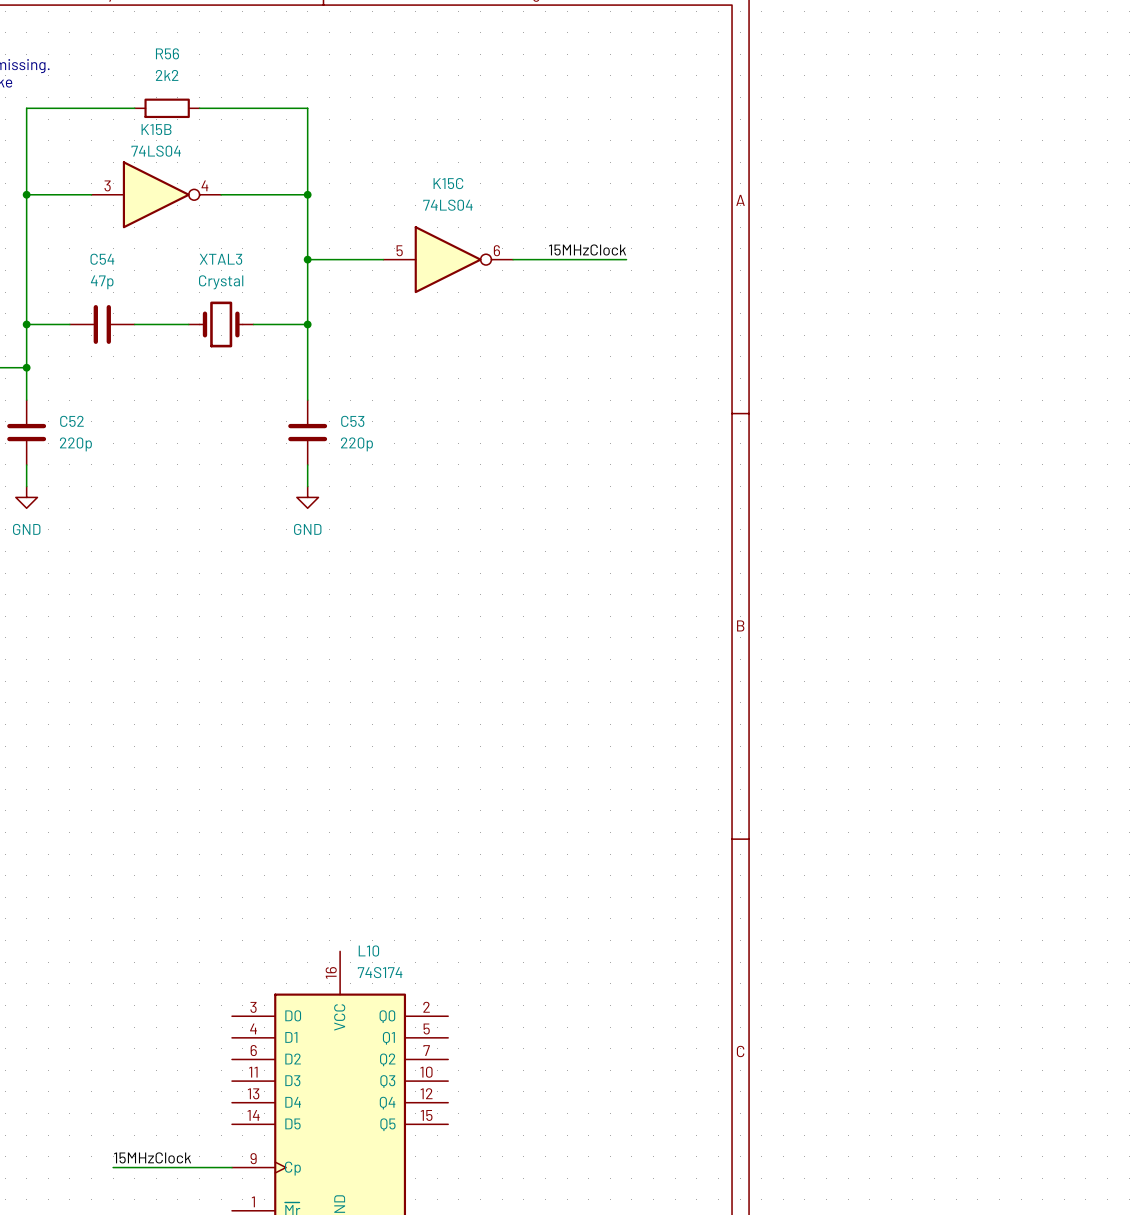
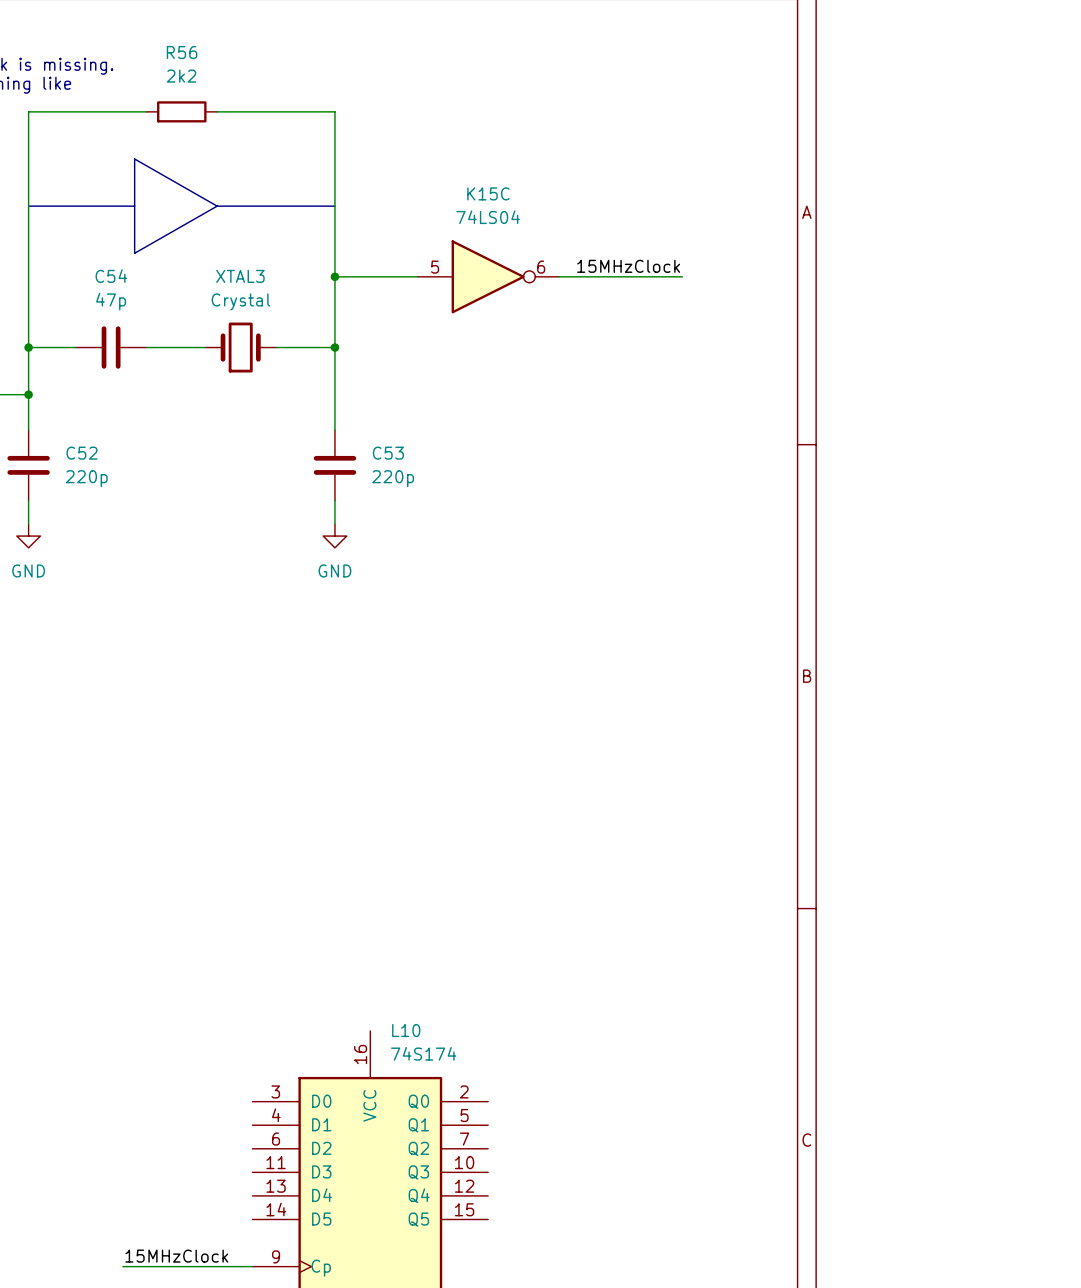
line: none -> (28, 206) (134, 206)
junction: (26, 194) -> none
K15B: 74LS04 (156, 194) -> none
line: none -> (217, 206) (334, 206)
line: none -> (217, 206) (134, 253) (134, 159) (217, 206)
junction: (307, 194) -> none

